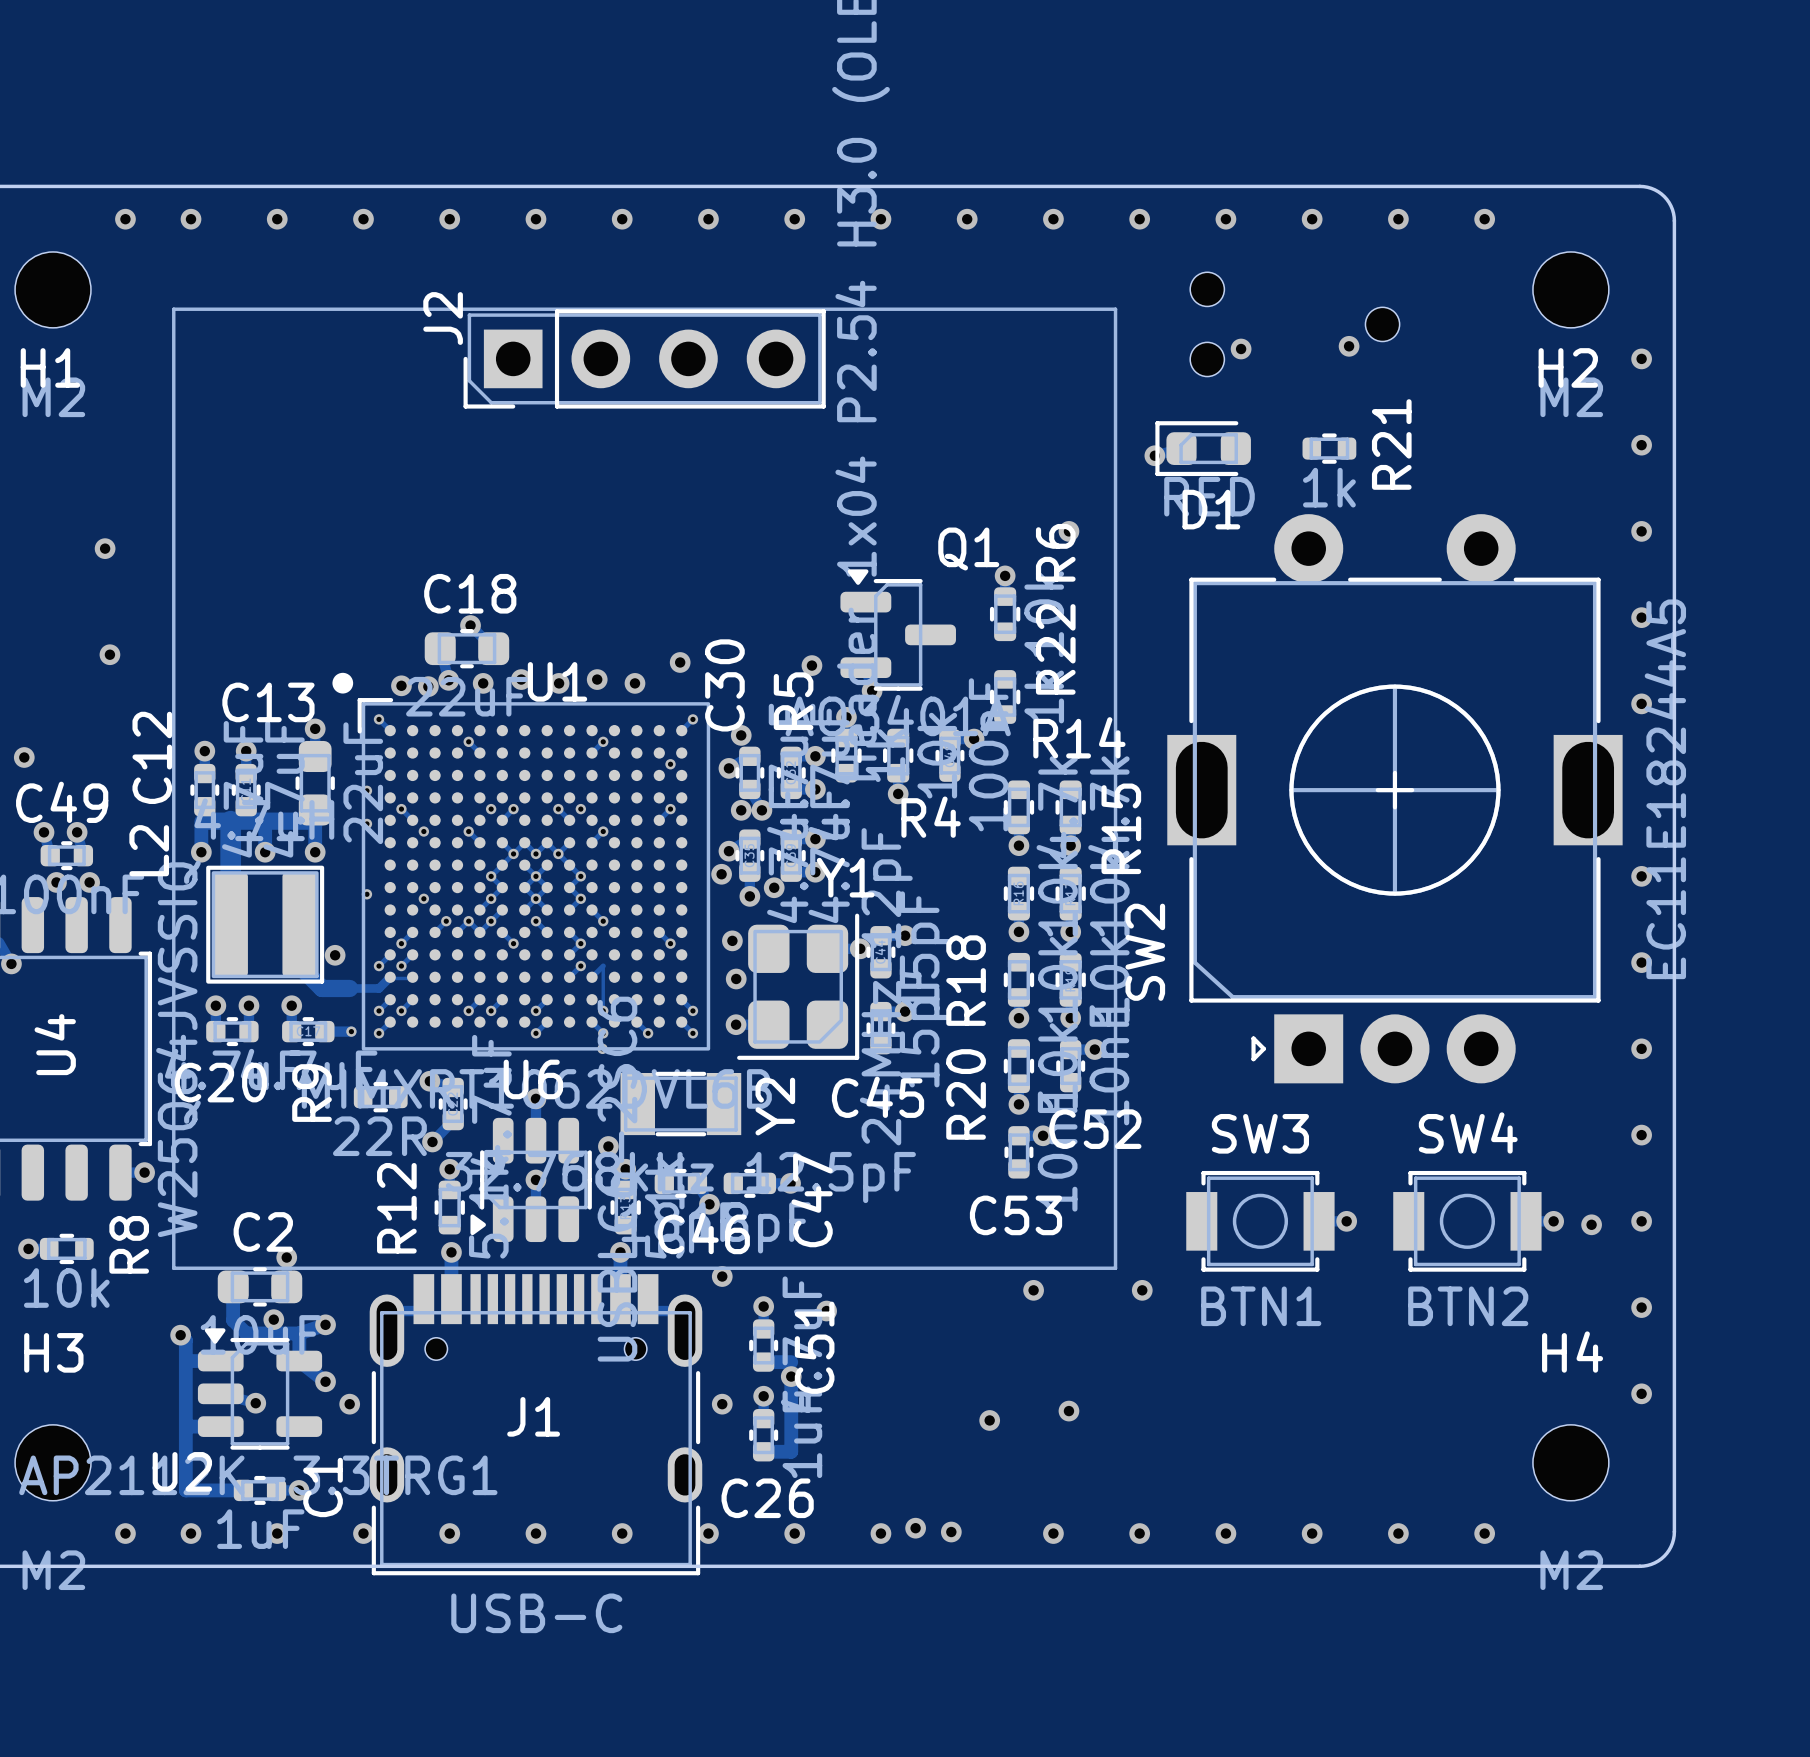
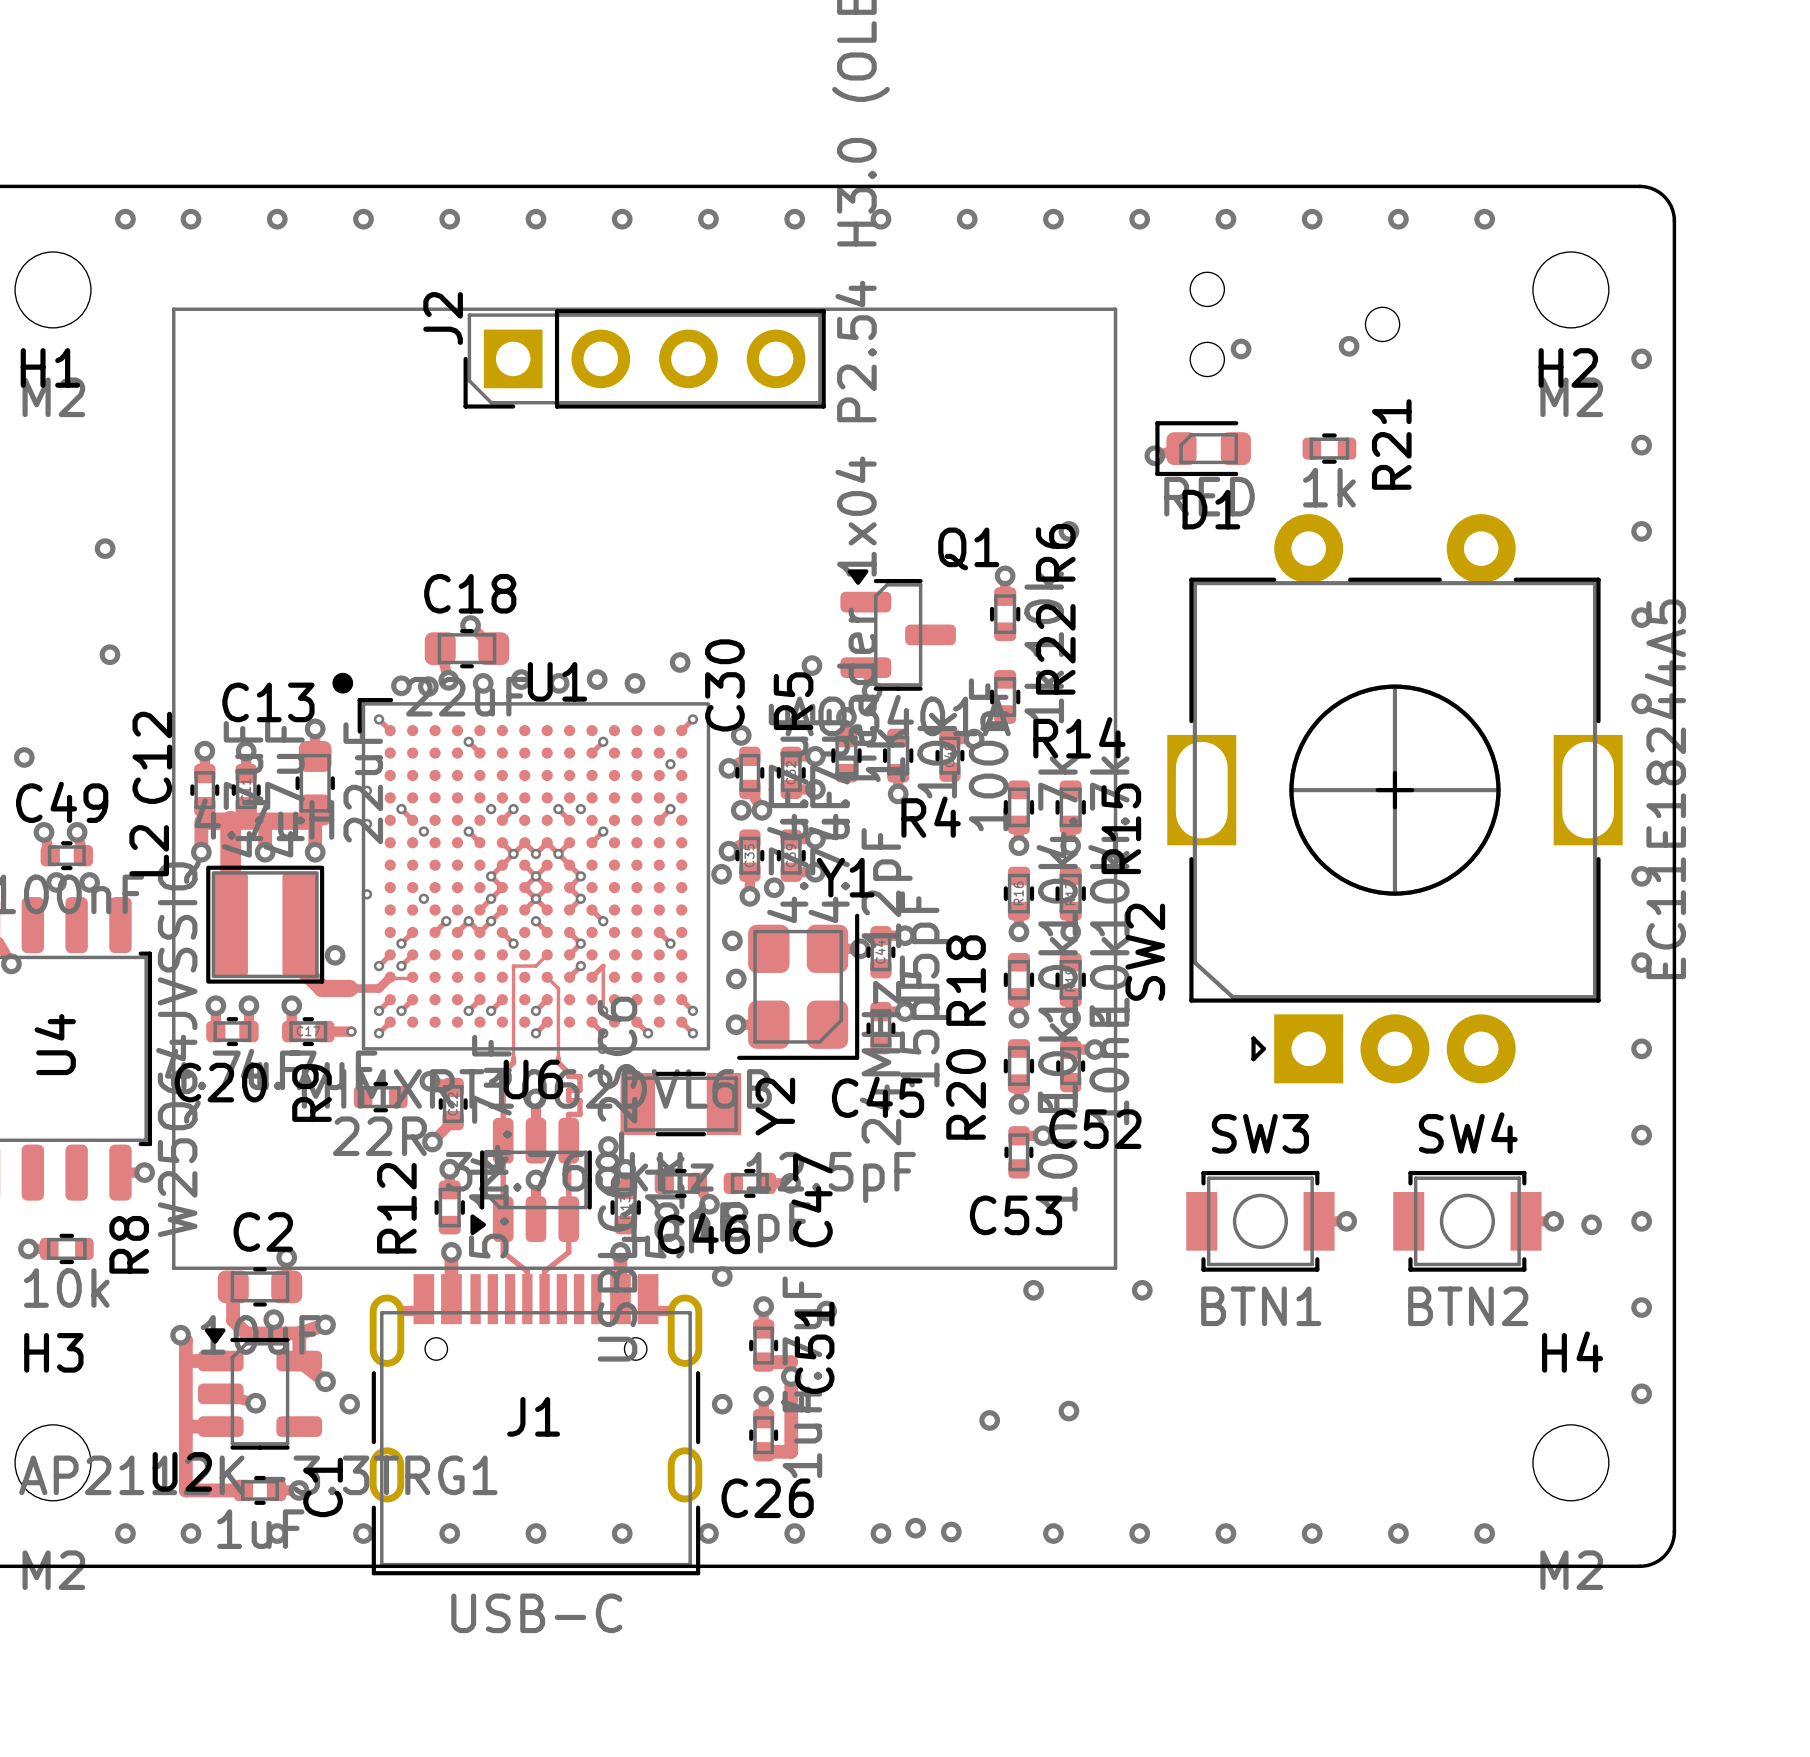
track: none -> (547, 954) (535, 966) (513, 966) (513, 1062) (503, 1073) (503, 1252) (527, 1271) (527, 1299)
track: none -> (547, 977) (558, 988) (558, 1062) (568, 1073) (568, 1076) (579, 1076) (579, 1090) (568, 1090) (568, 1100) (579, 1100) (579, 1114) (568, 1114) (568, 1252) (544, 1271) (544, 1299)

